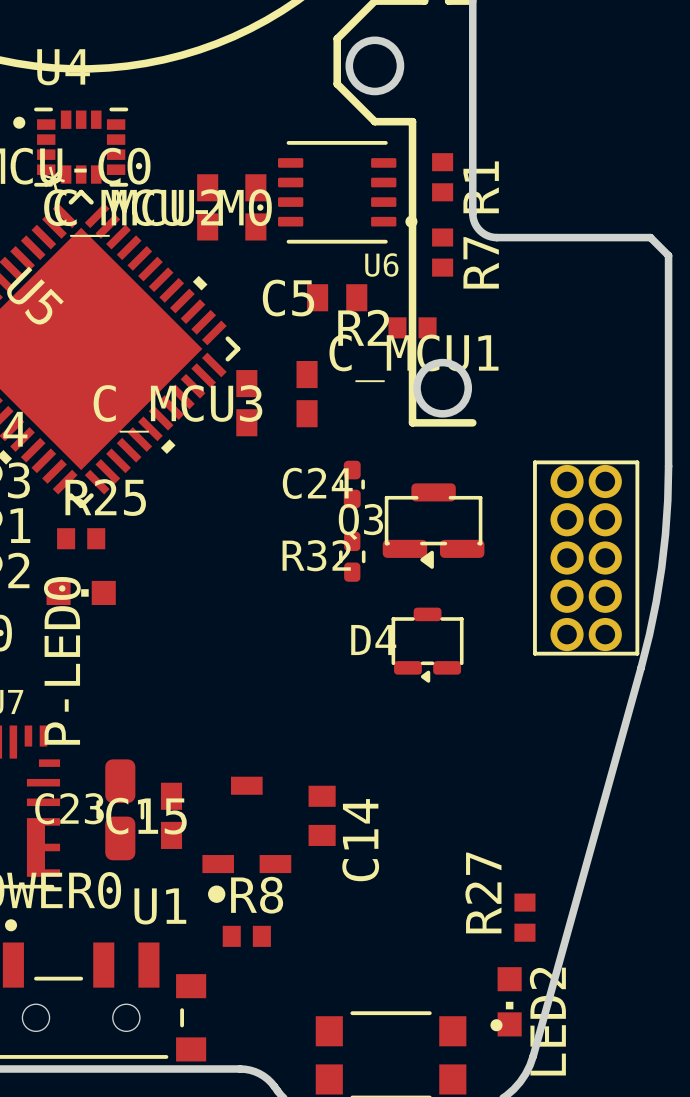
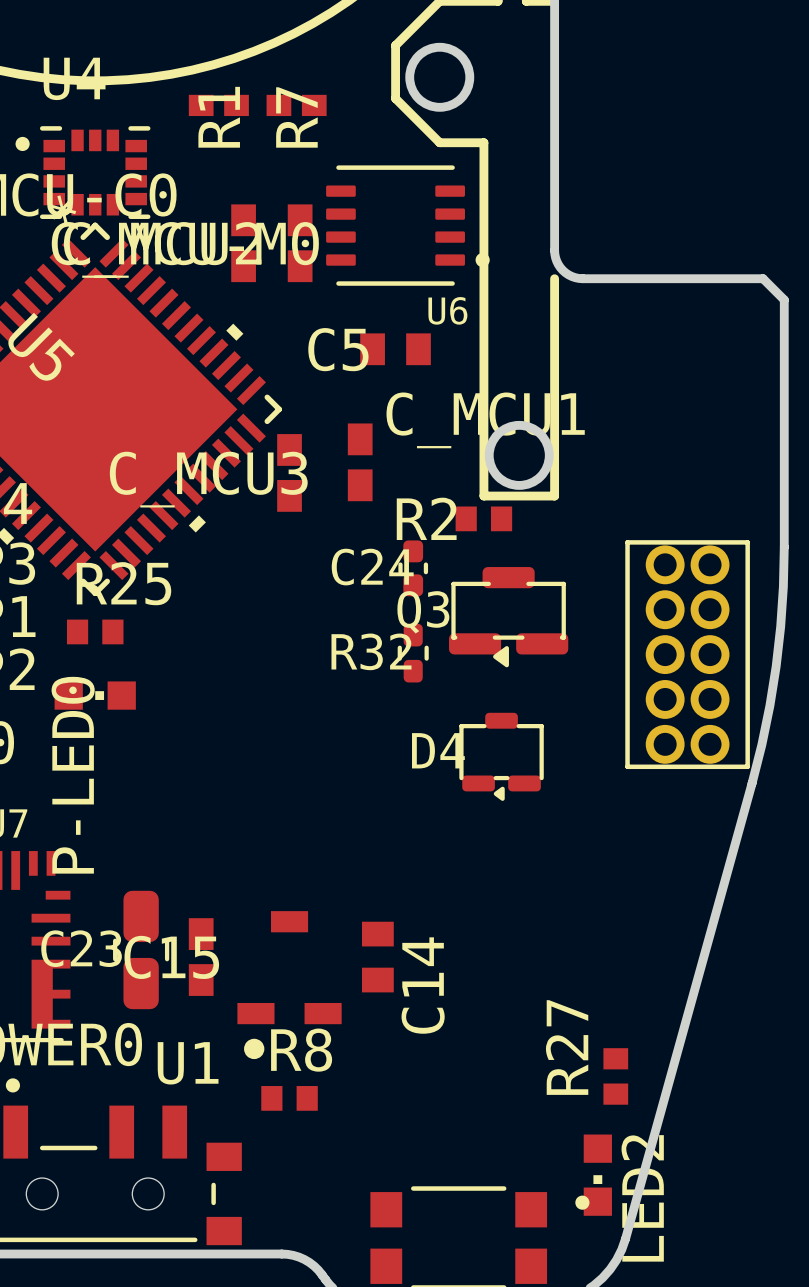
R1 footprint: [432, 153, 454, 202] -> [188, 94, 249, 117]
R7 footprint: [432, 228, 454, 277] -> [266, 94, 327, 117]
line: none -> (554, 278) (554, 496)
R2 position: (412, 327) -> (483, 518)

